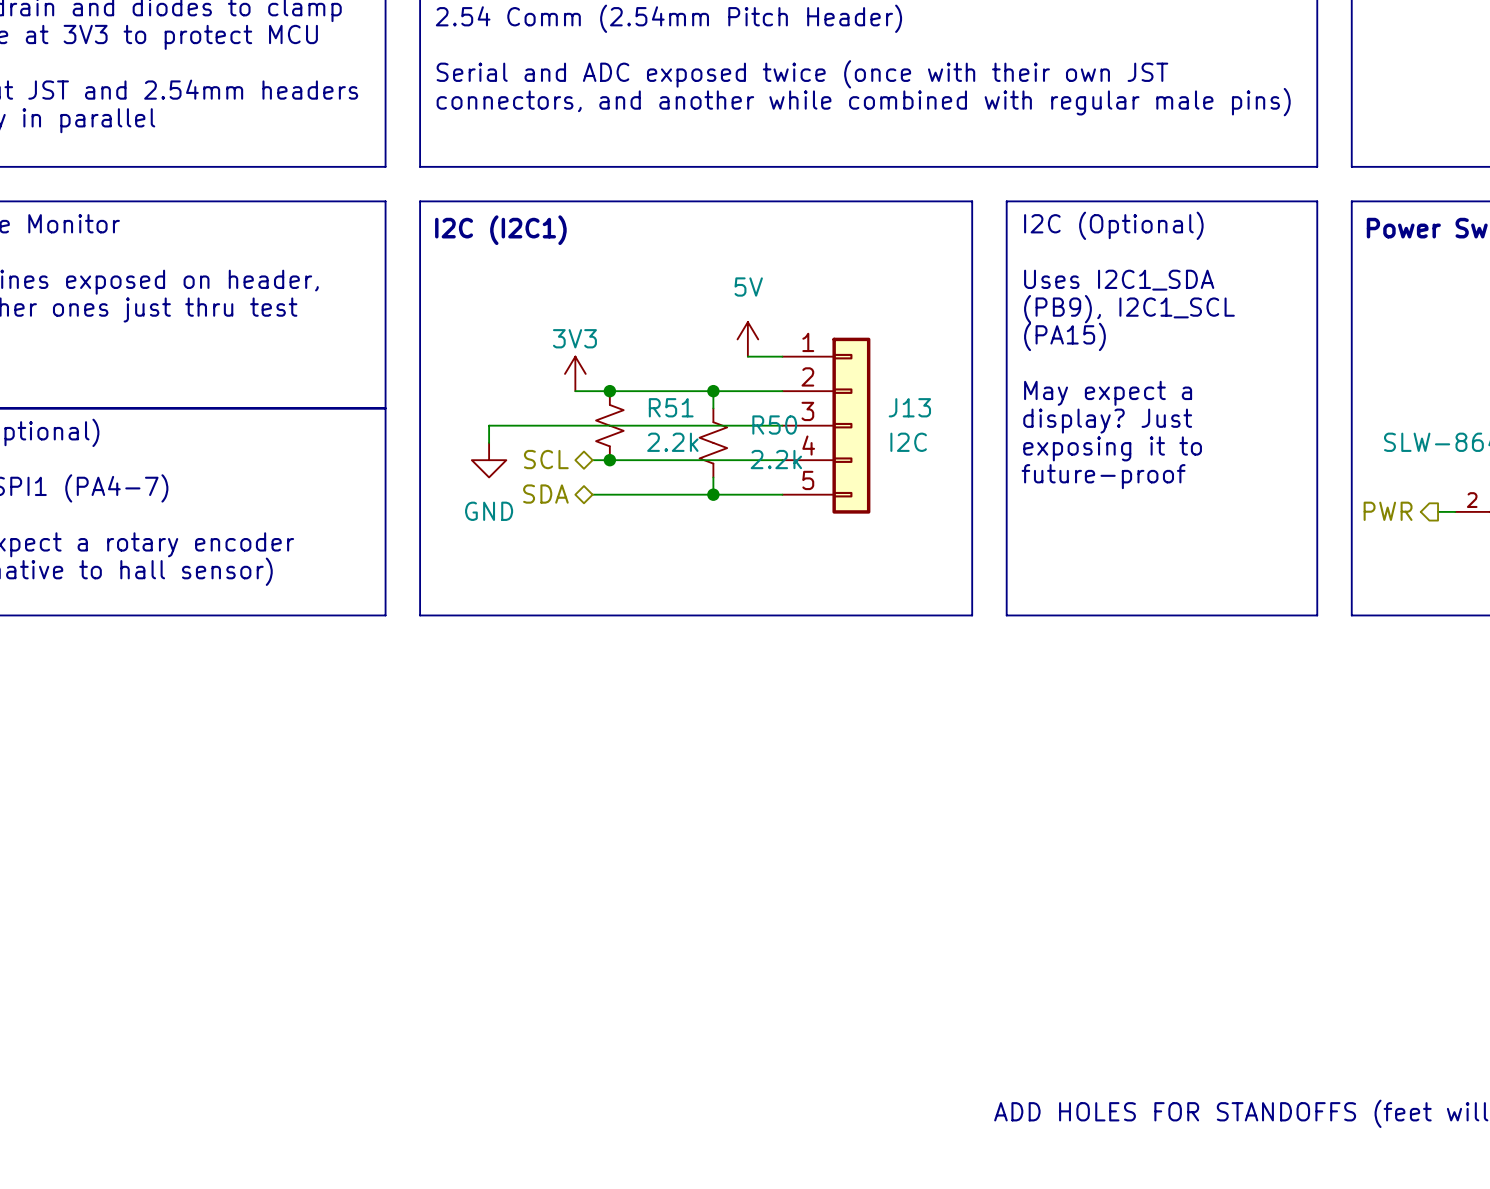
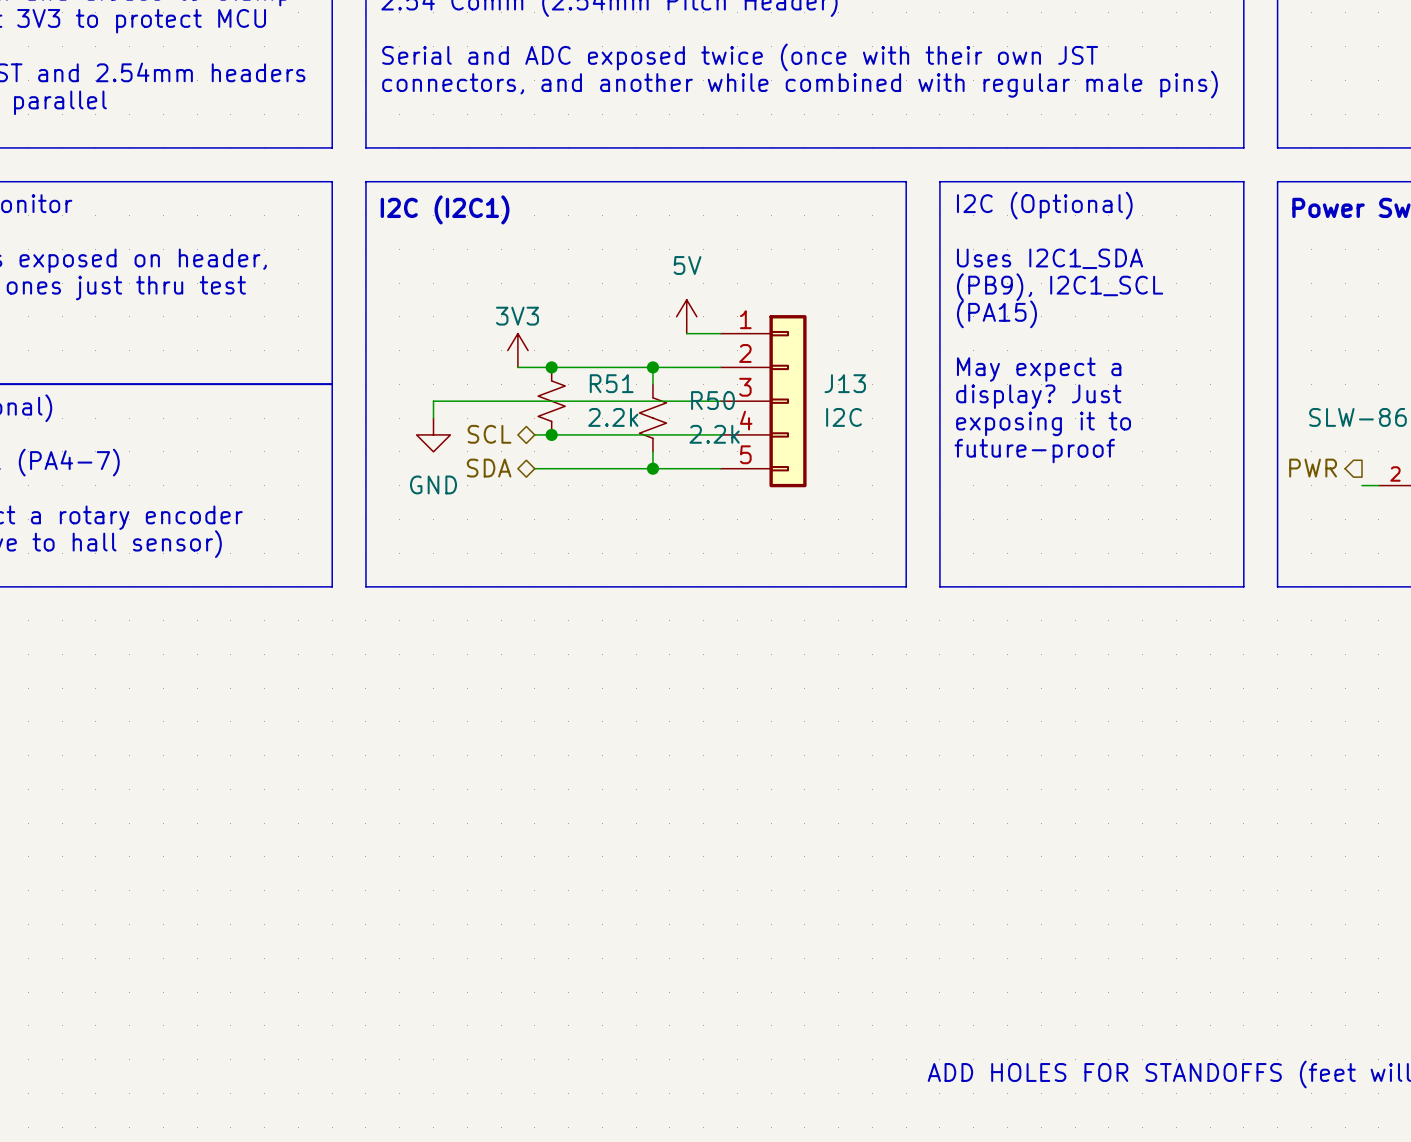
hierarchical label position: PWR (1388, 511) -> PWR (1313, 468)

